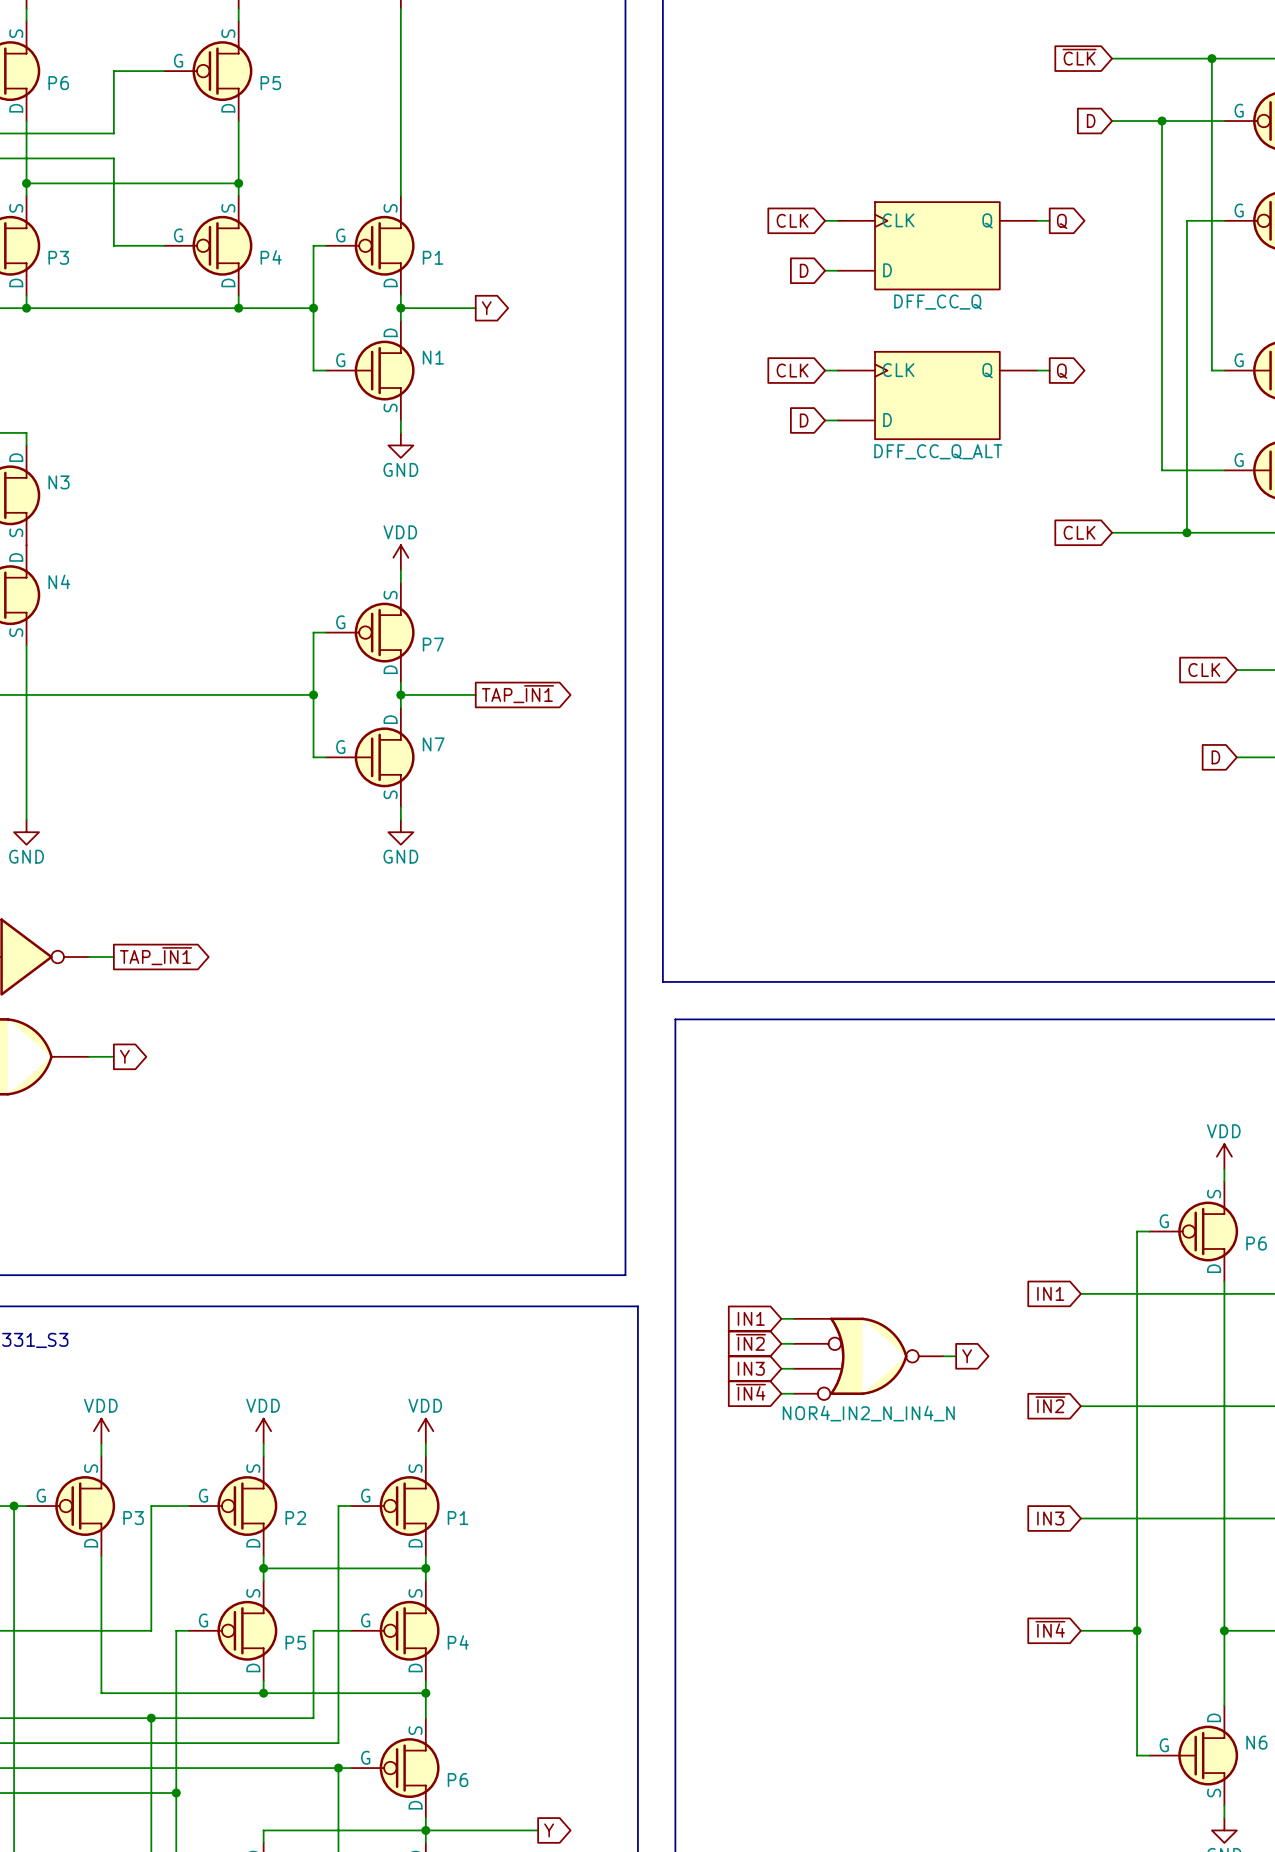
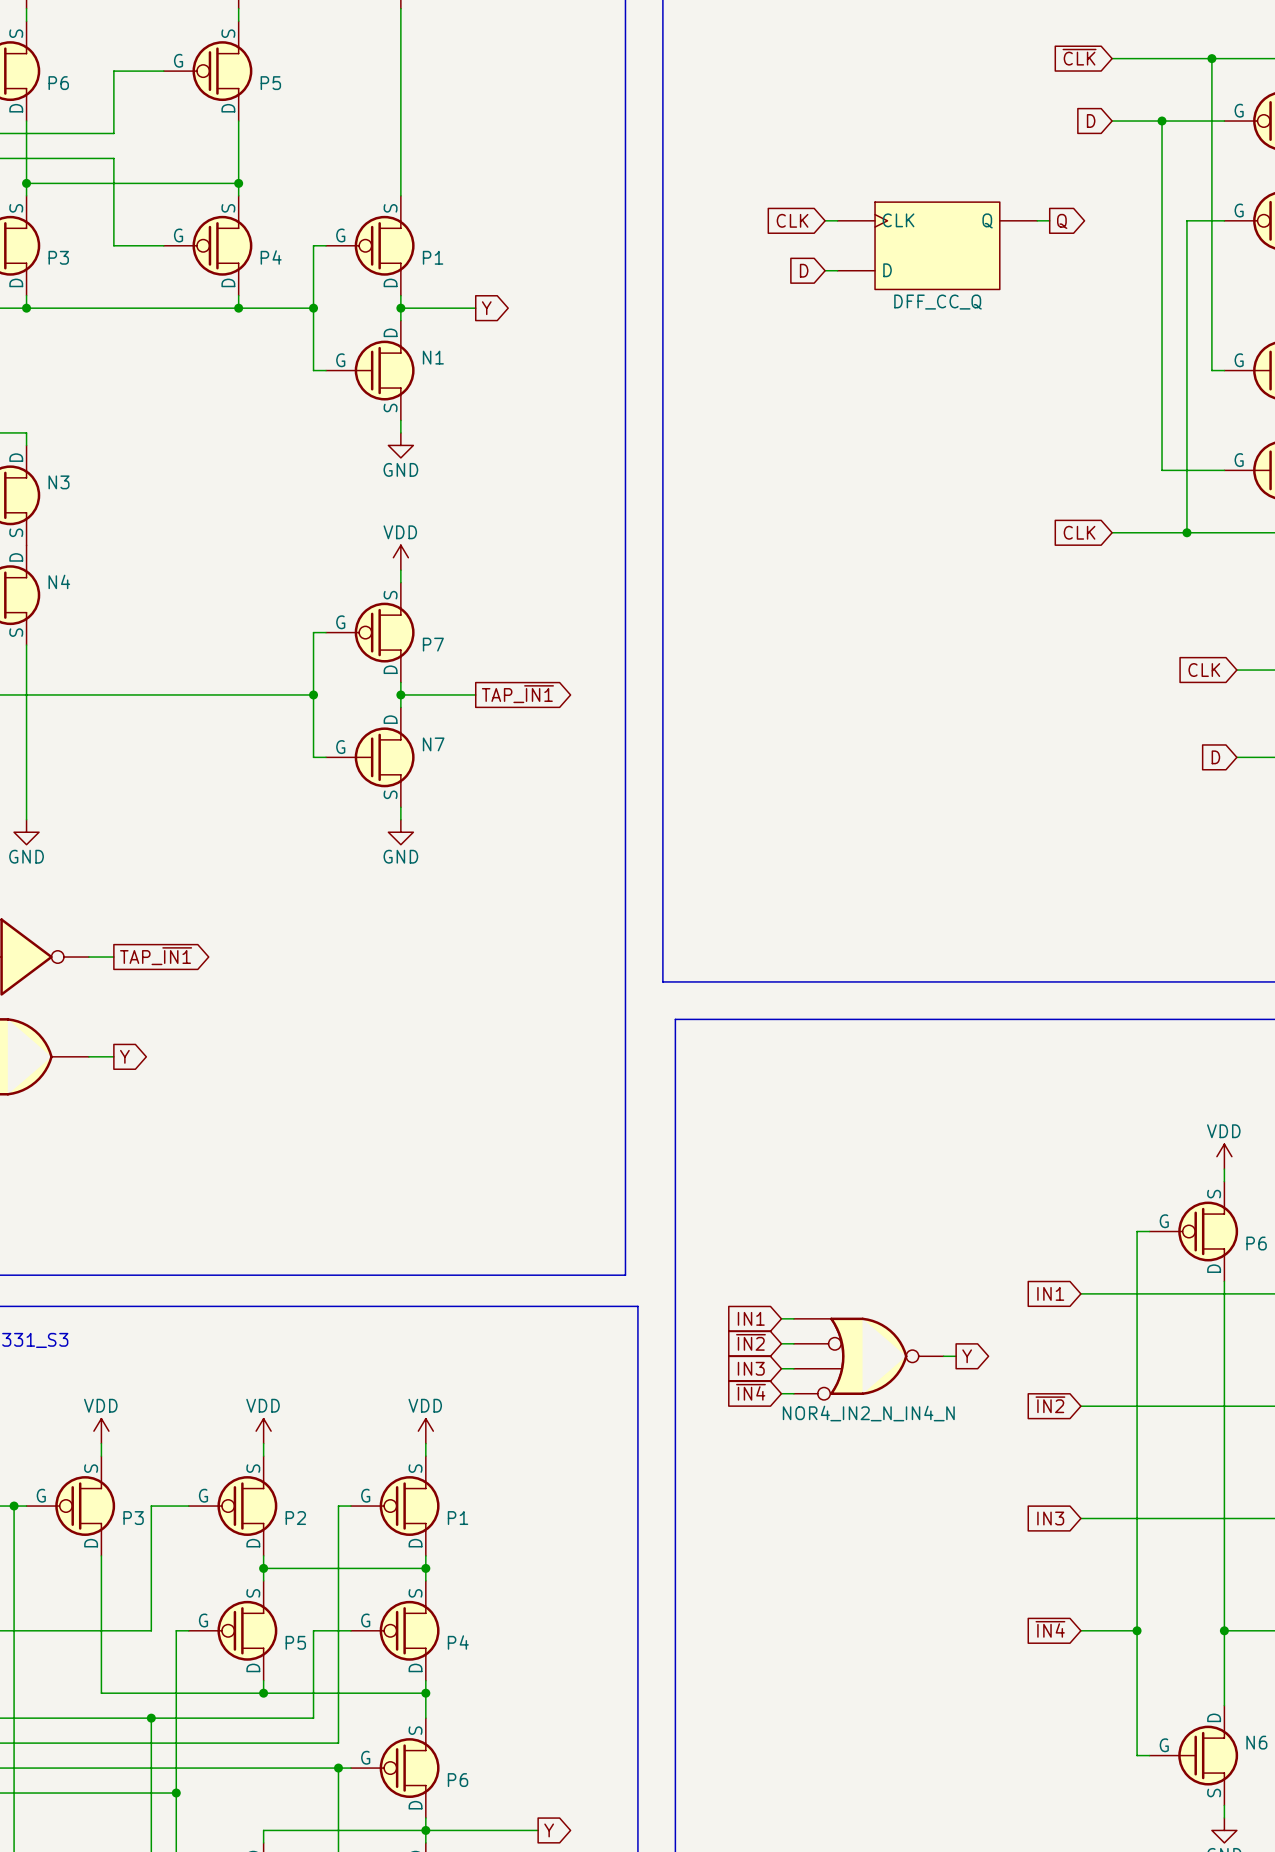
global label: CLK (792, 370) -> none
wire: (825, 370) (837, 370) -> none
wire: (1037, 370) (1049, 370) -> none
global label: Q (1062, 371) -> none
part: DFF_CC_Q_ALT (937, 395) -> none
global label: D (804, 420) -> none
wire: (825, 420) (837, 420) -> none

